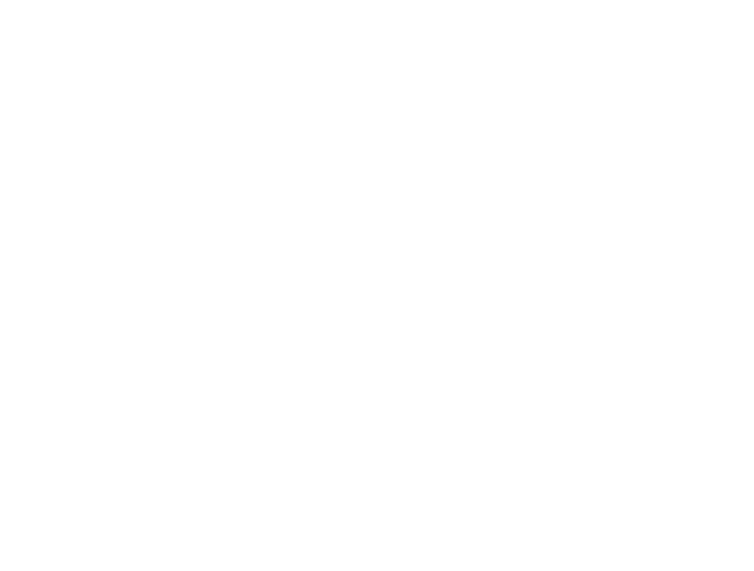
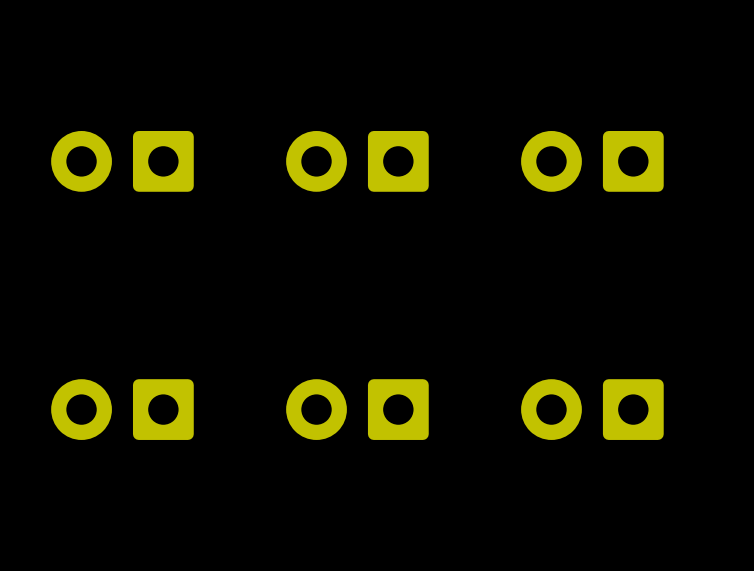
part: none -> (122, 161)
part: none -> (357, 161)
part: none -> (592, 161)
part: none -> (122, 409)
part: none -> (357, 409)
part: none -> (592, 409)

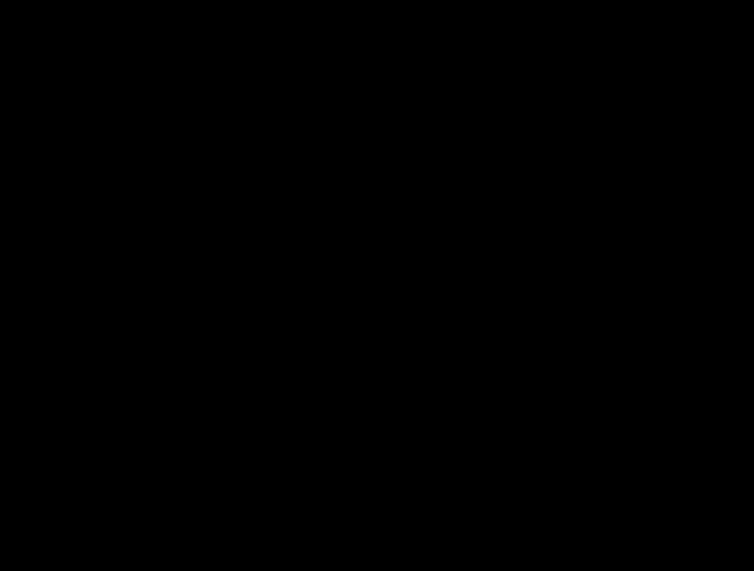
part: (122, 161) -> none
part: (357, 161) -> none
part: (592, 161) -> none
part: (122, 409) -> none
part: (357, 409) -> none
part: (592, 409) -> none

